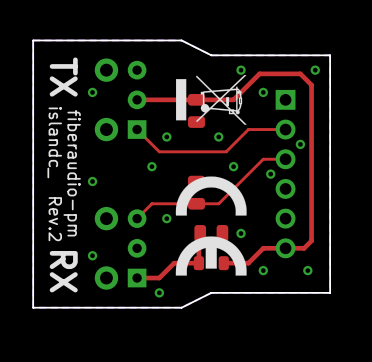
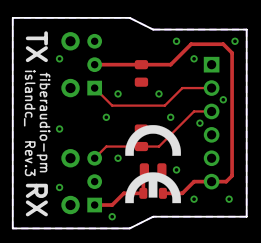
drawing: [175, 75, 247, 125] -> none
text: islandc_ Rev.2 (54, 174) -> islandc_ Rev.3 (29, 123)

